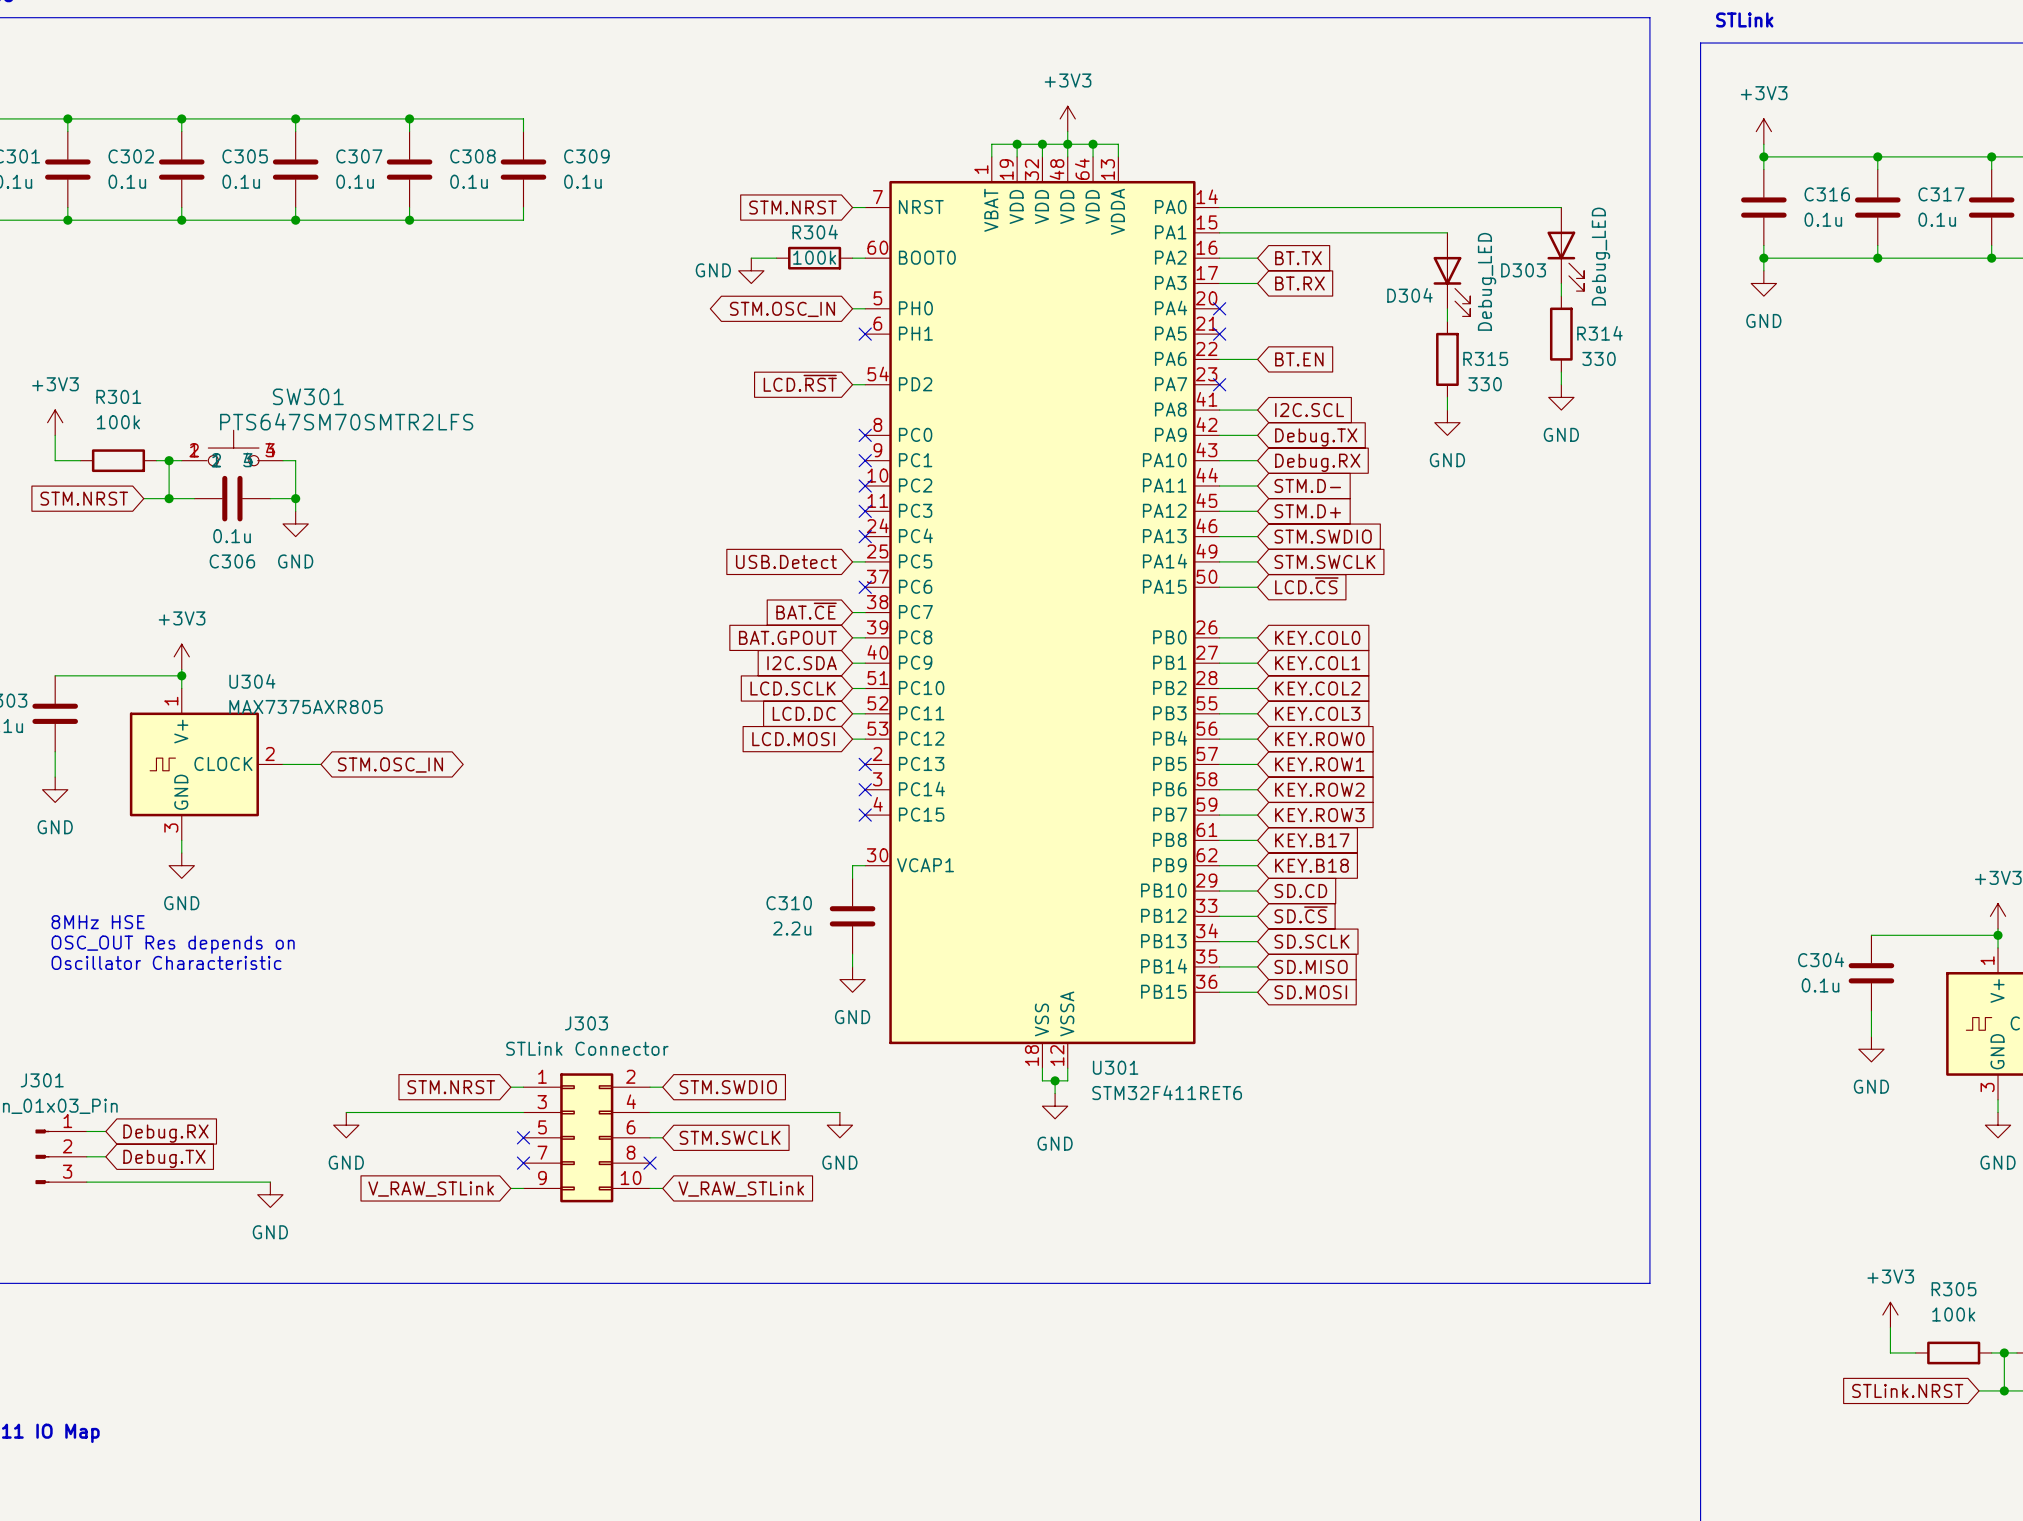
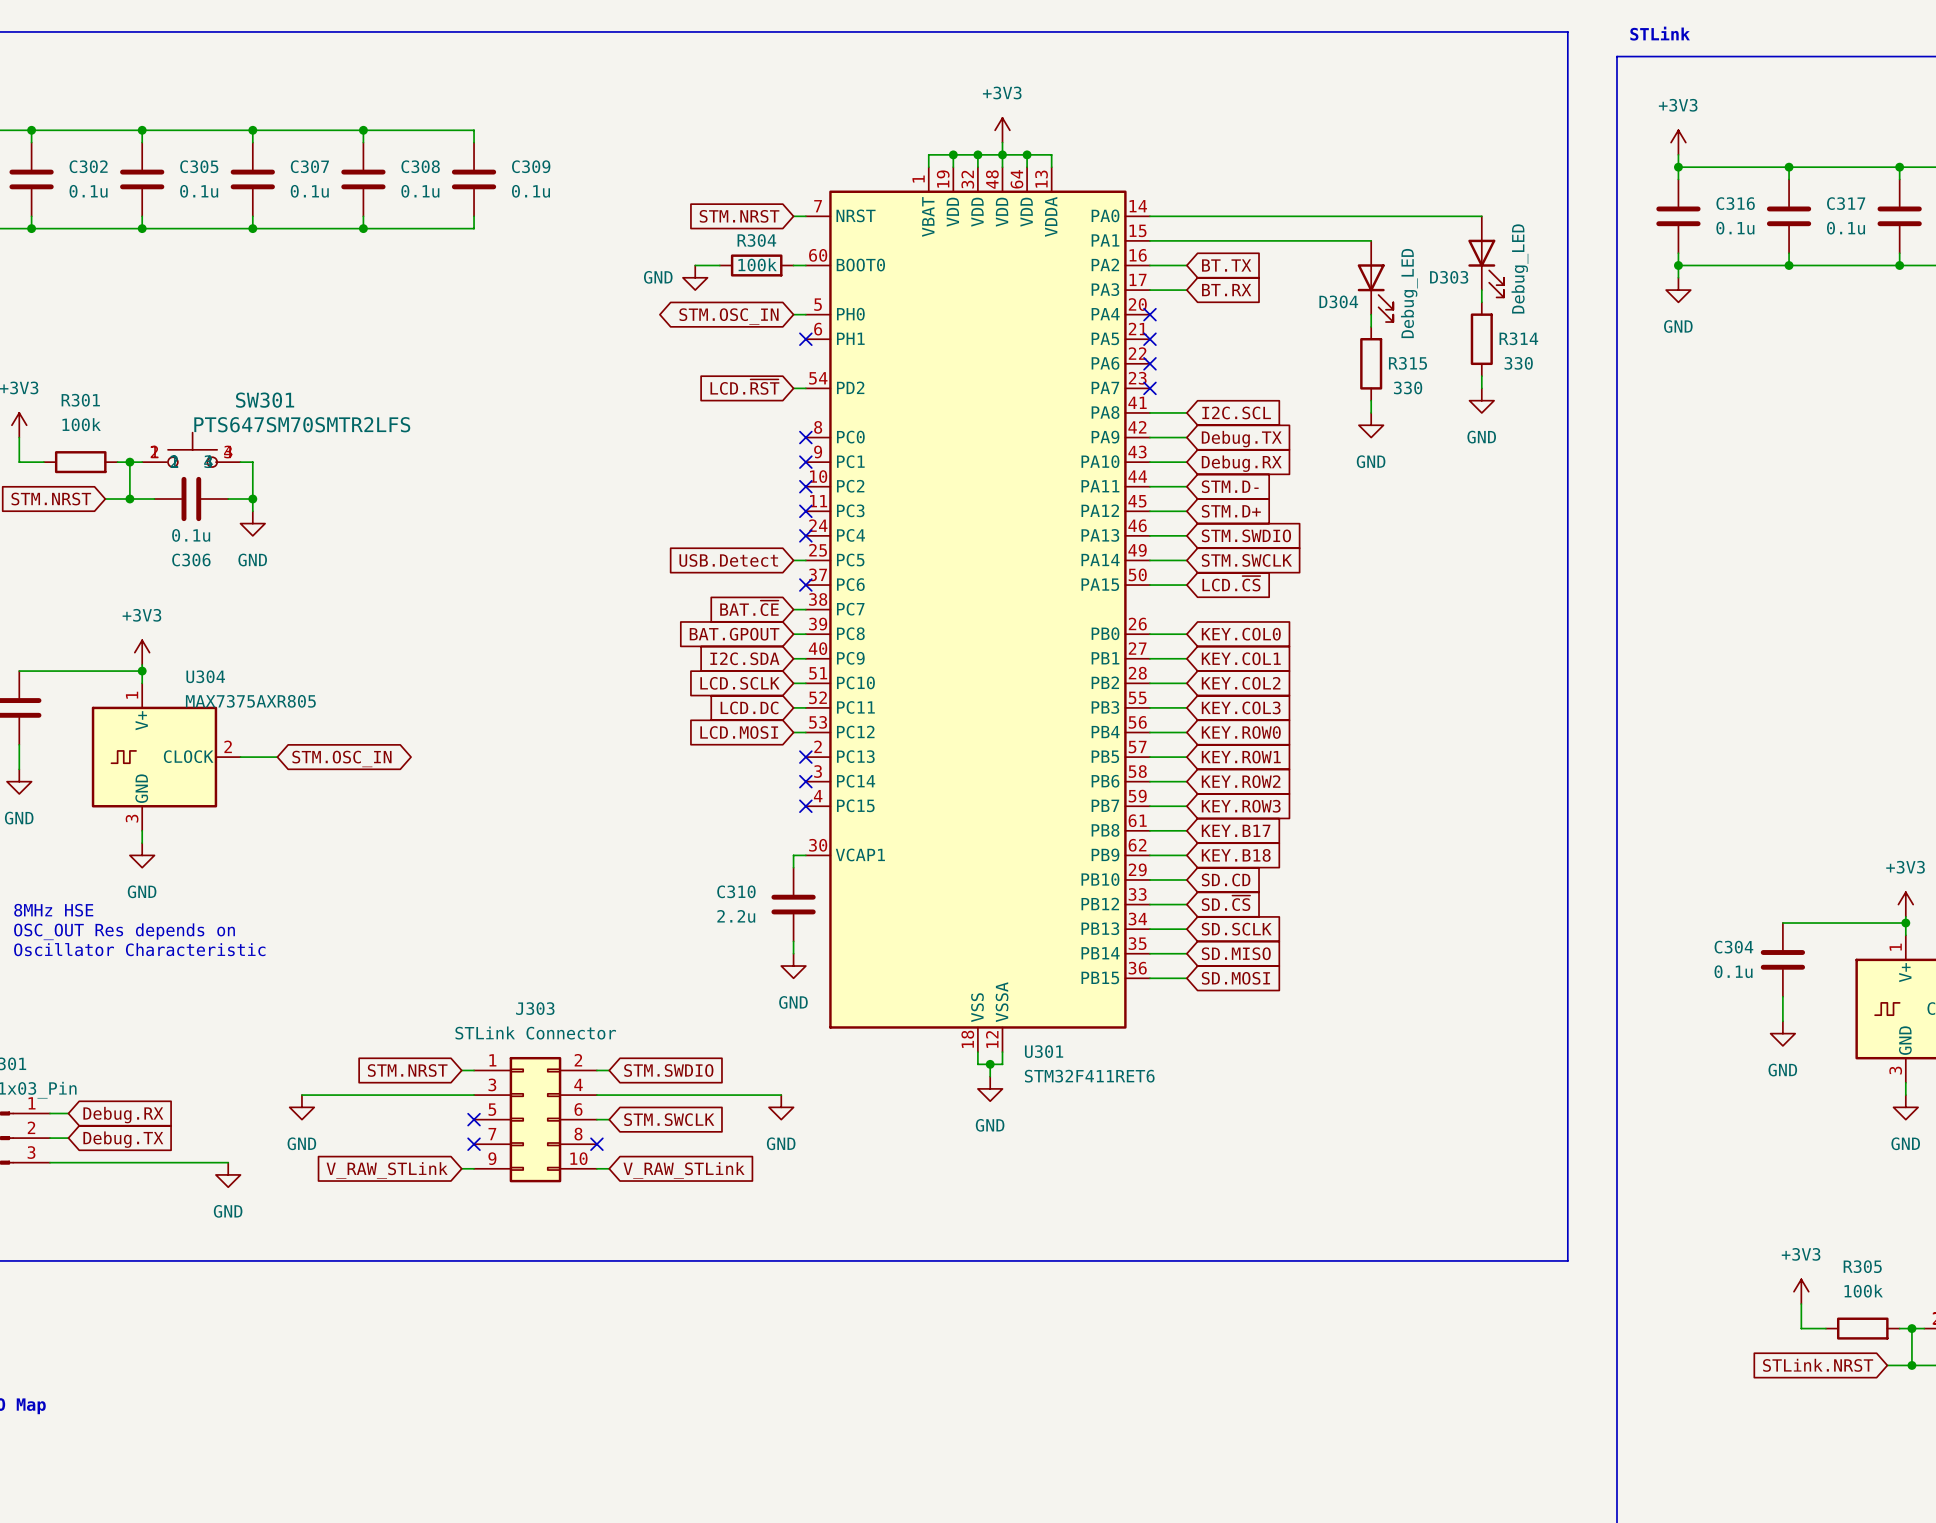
wire: (1219, 359) (1257, 359) -> none
no-connect mark: none -> (1149, 363)
global label: BT.EN (1299, 359) -> none

